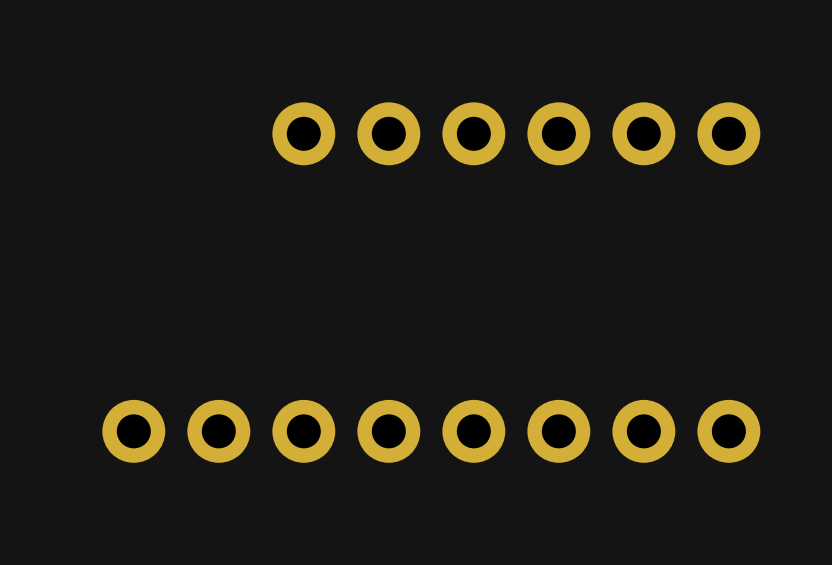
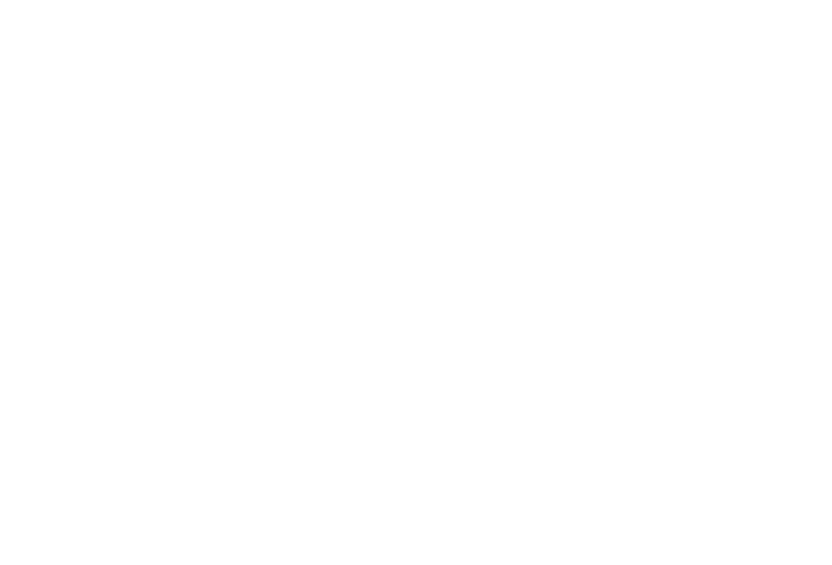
part: (516, 133) -> none
part: (431, 431) -> none

